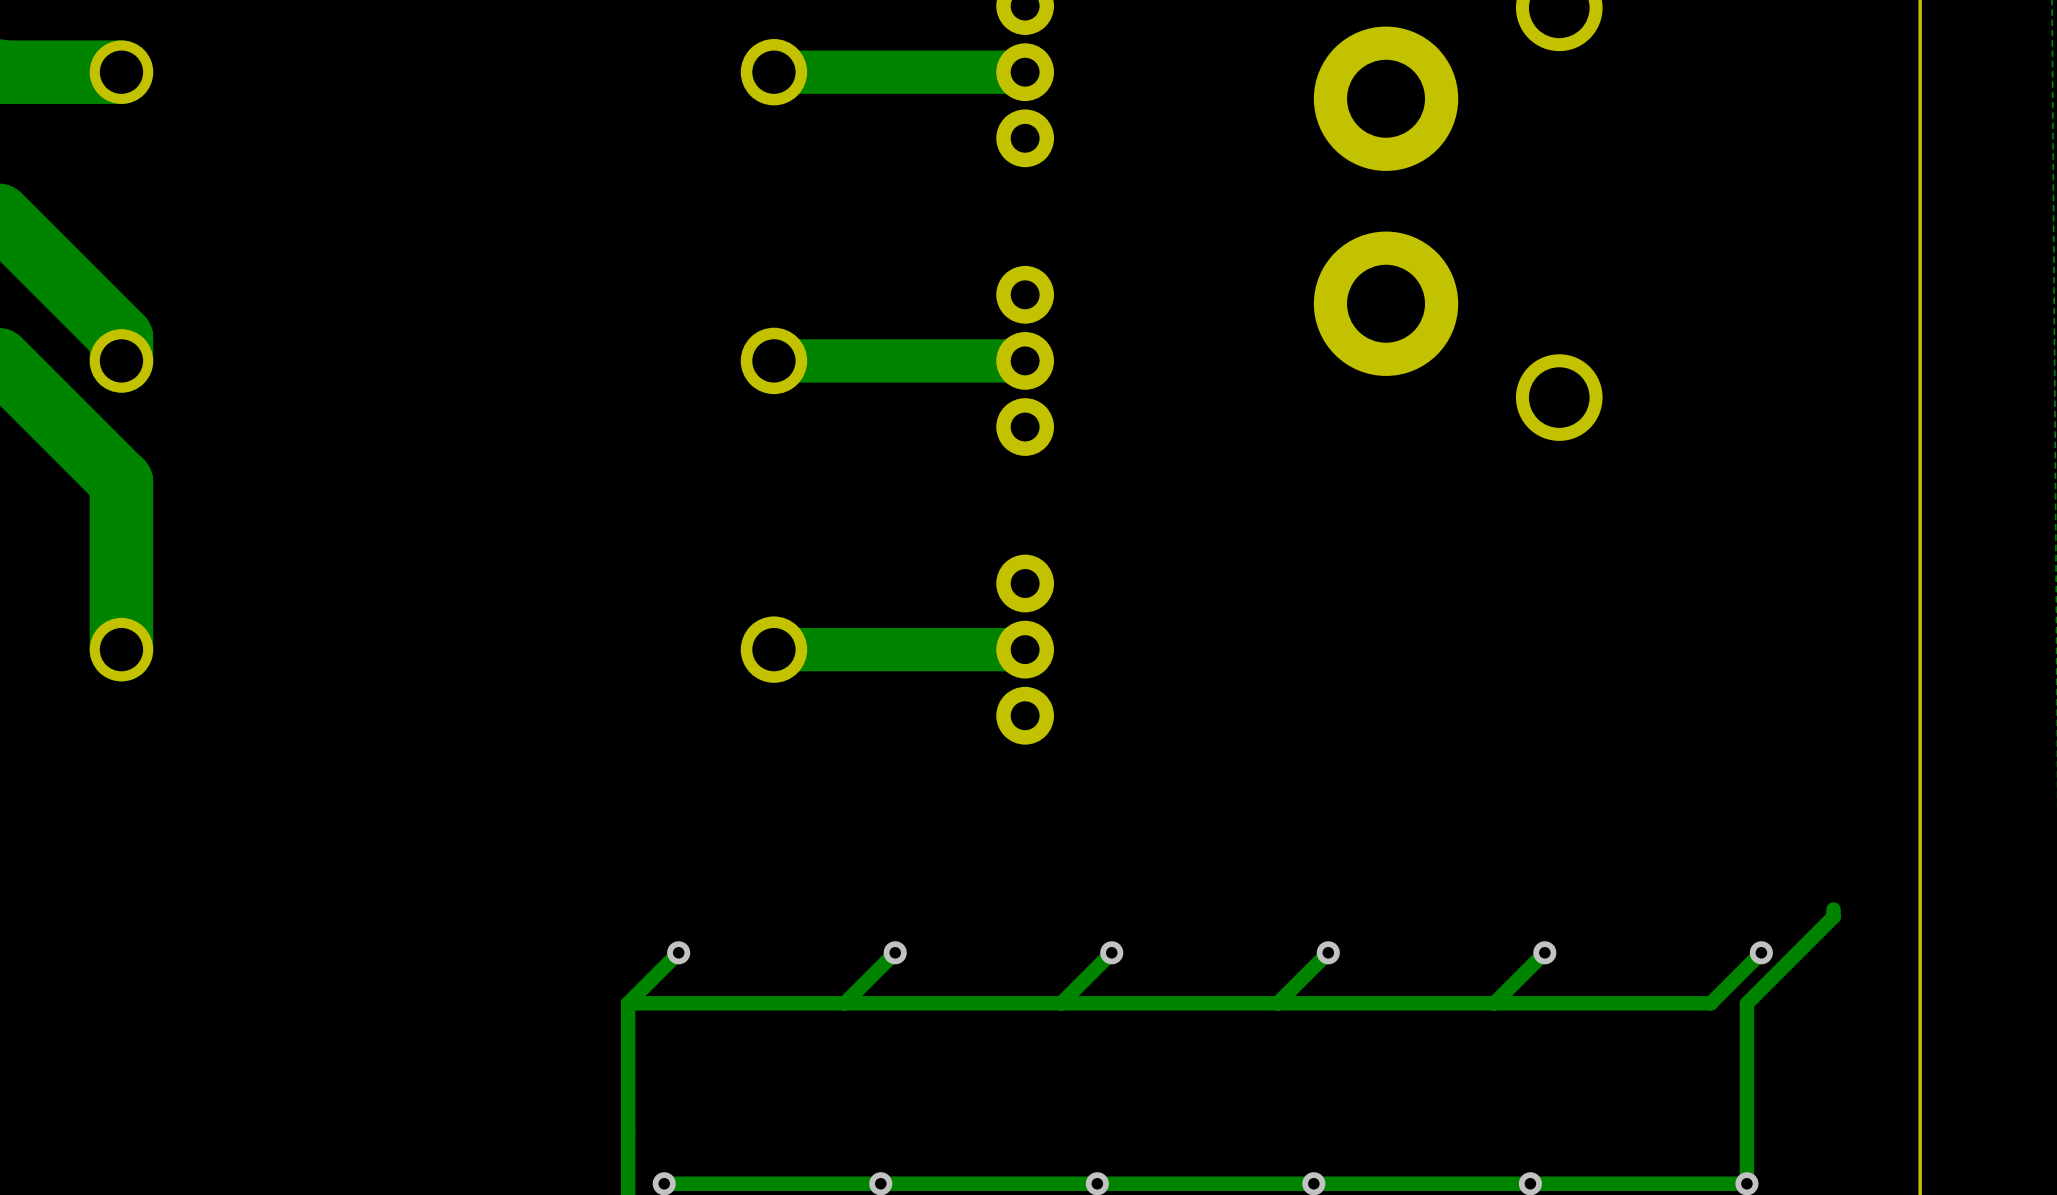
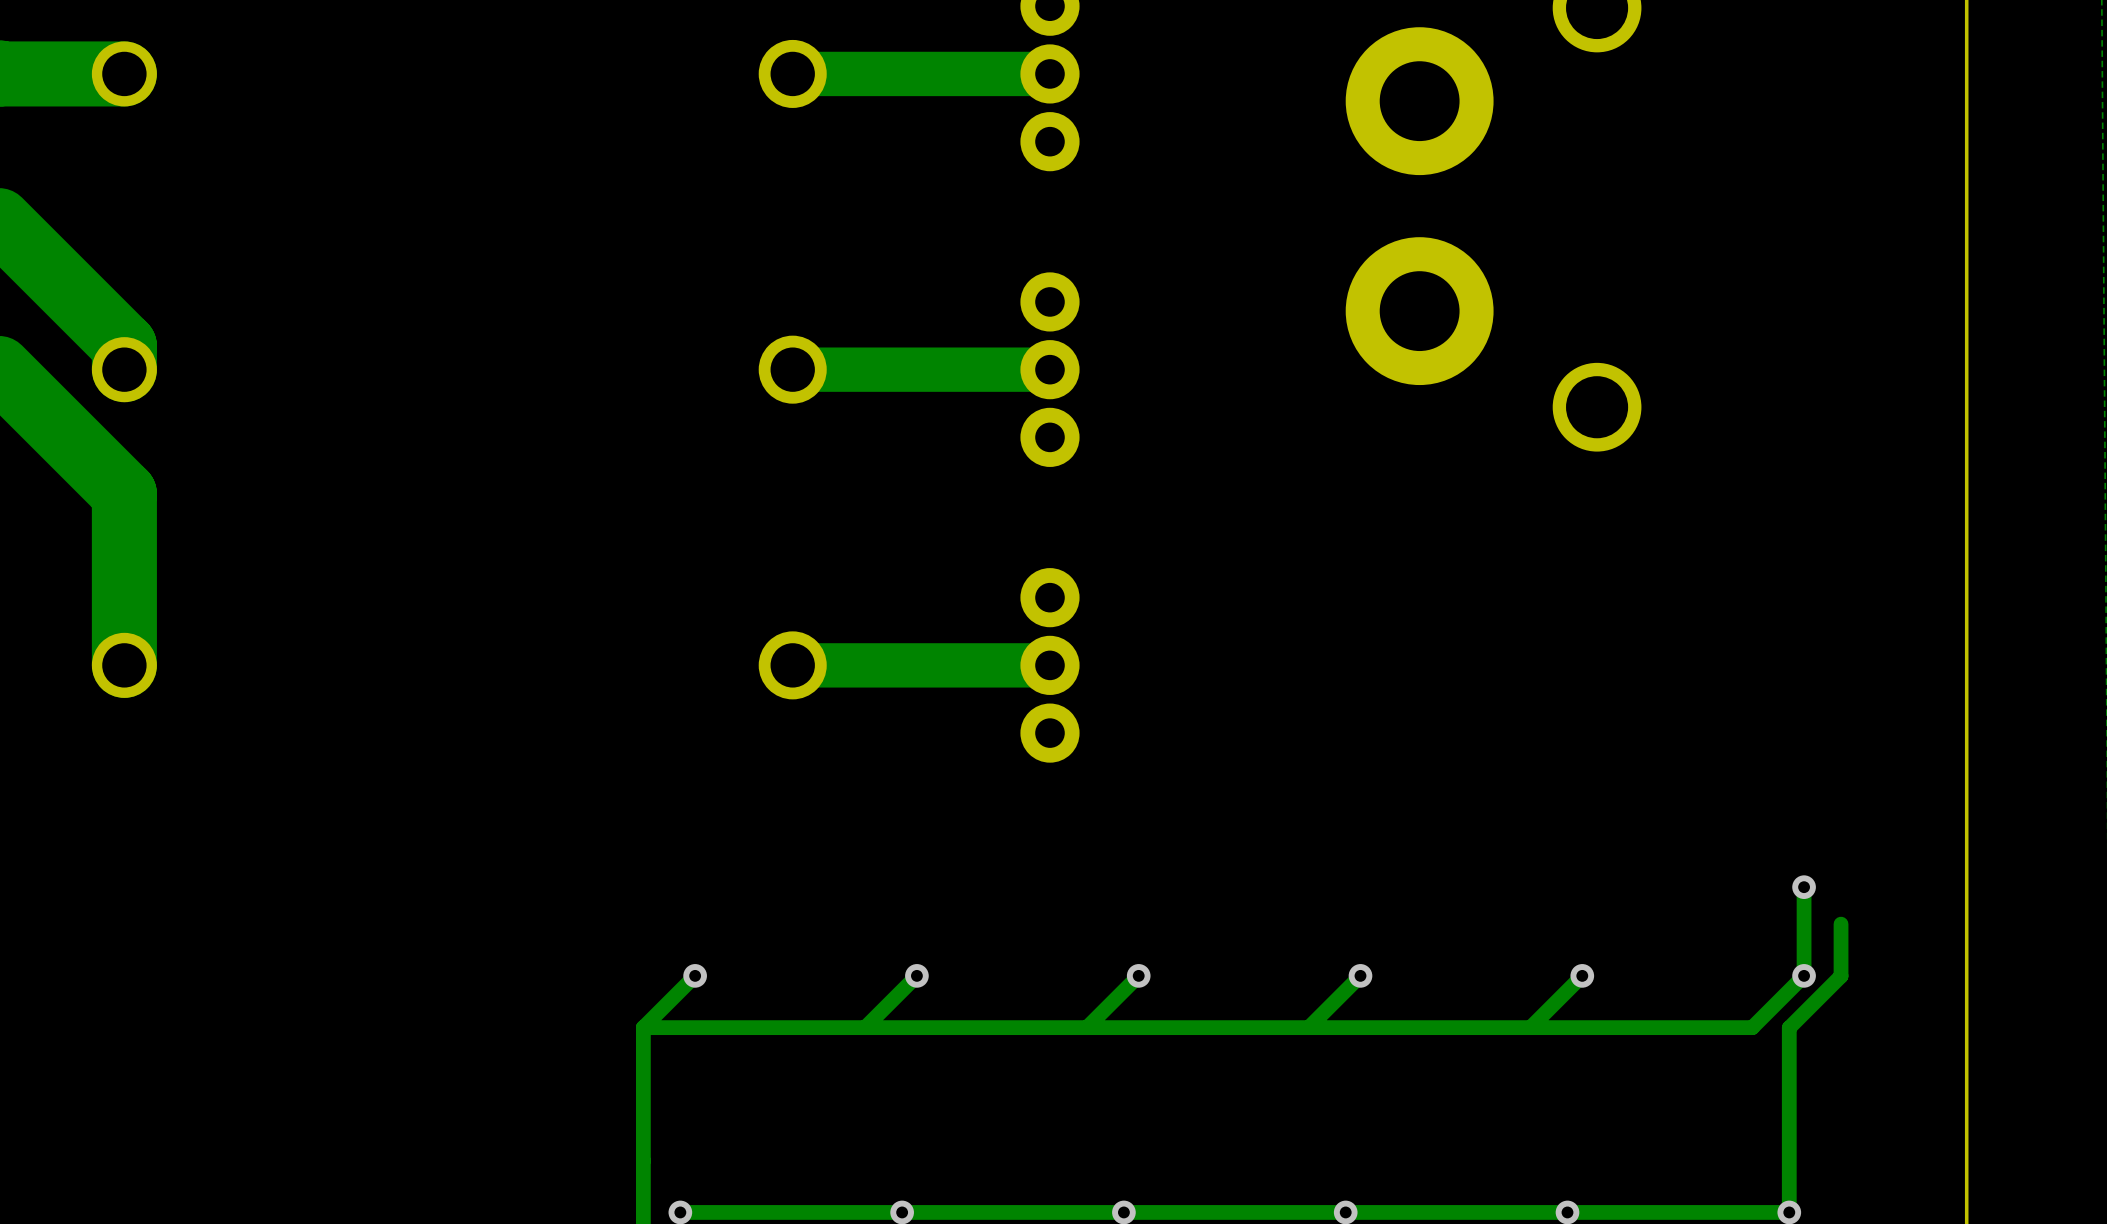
track: none -> (1804, 887) (1804, 975)
via: none -> (1804, 887)
track: (1833, 909) (1833, 916) (1797, 953) -> (1841, 924) (1841, 976)

